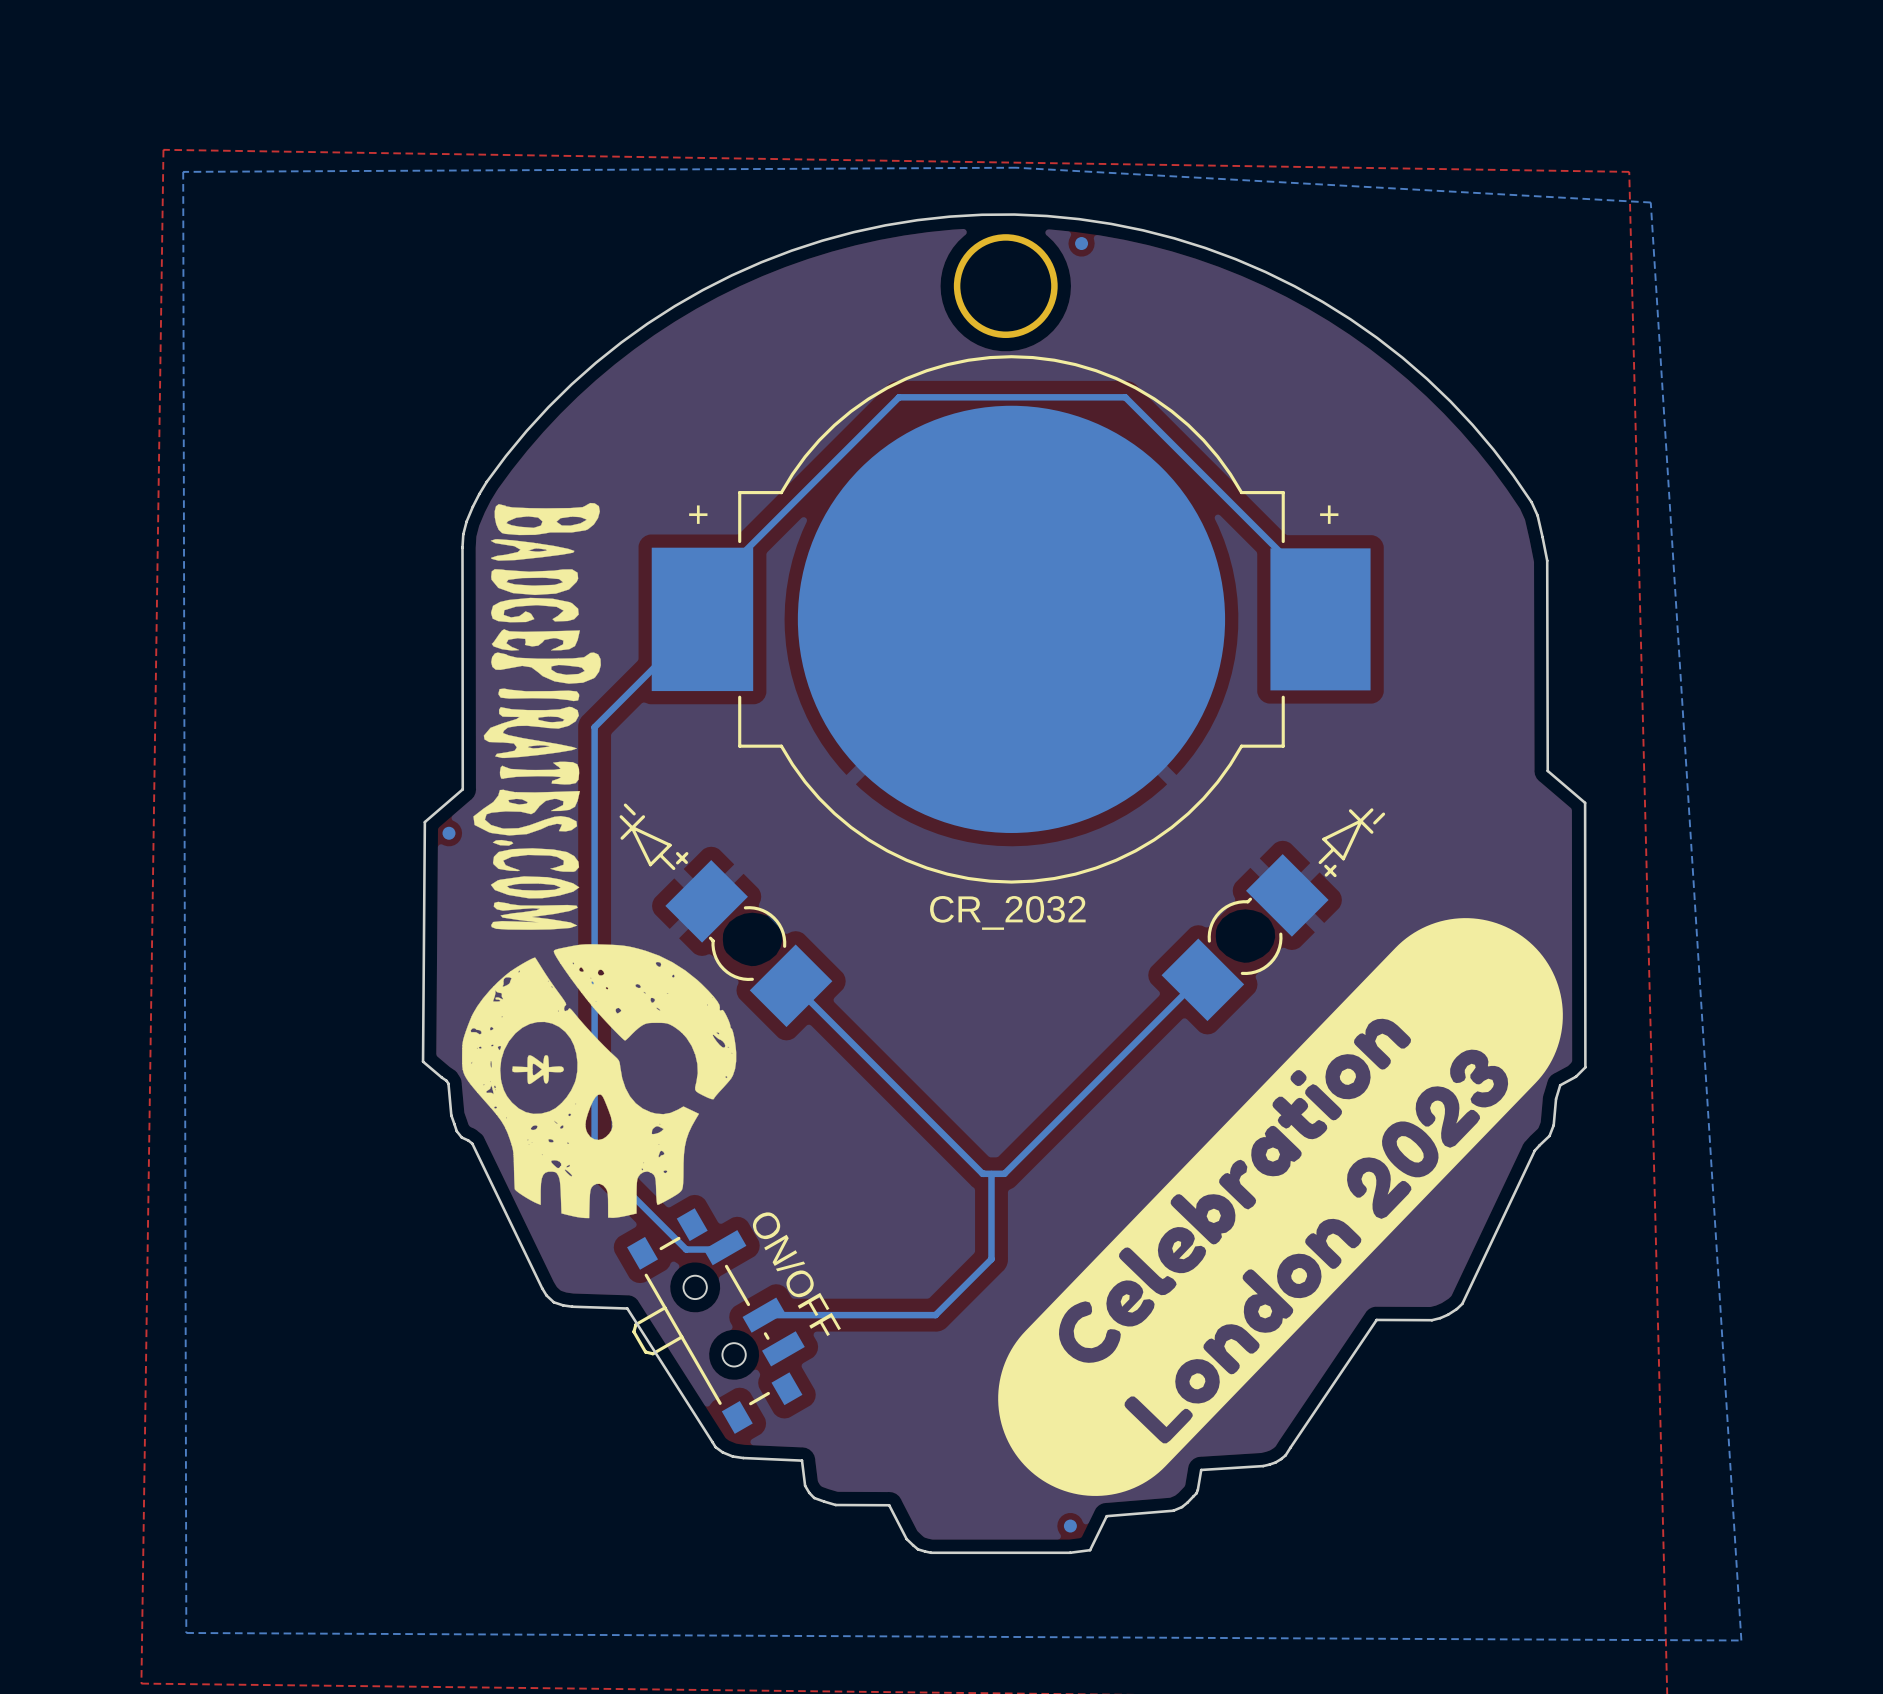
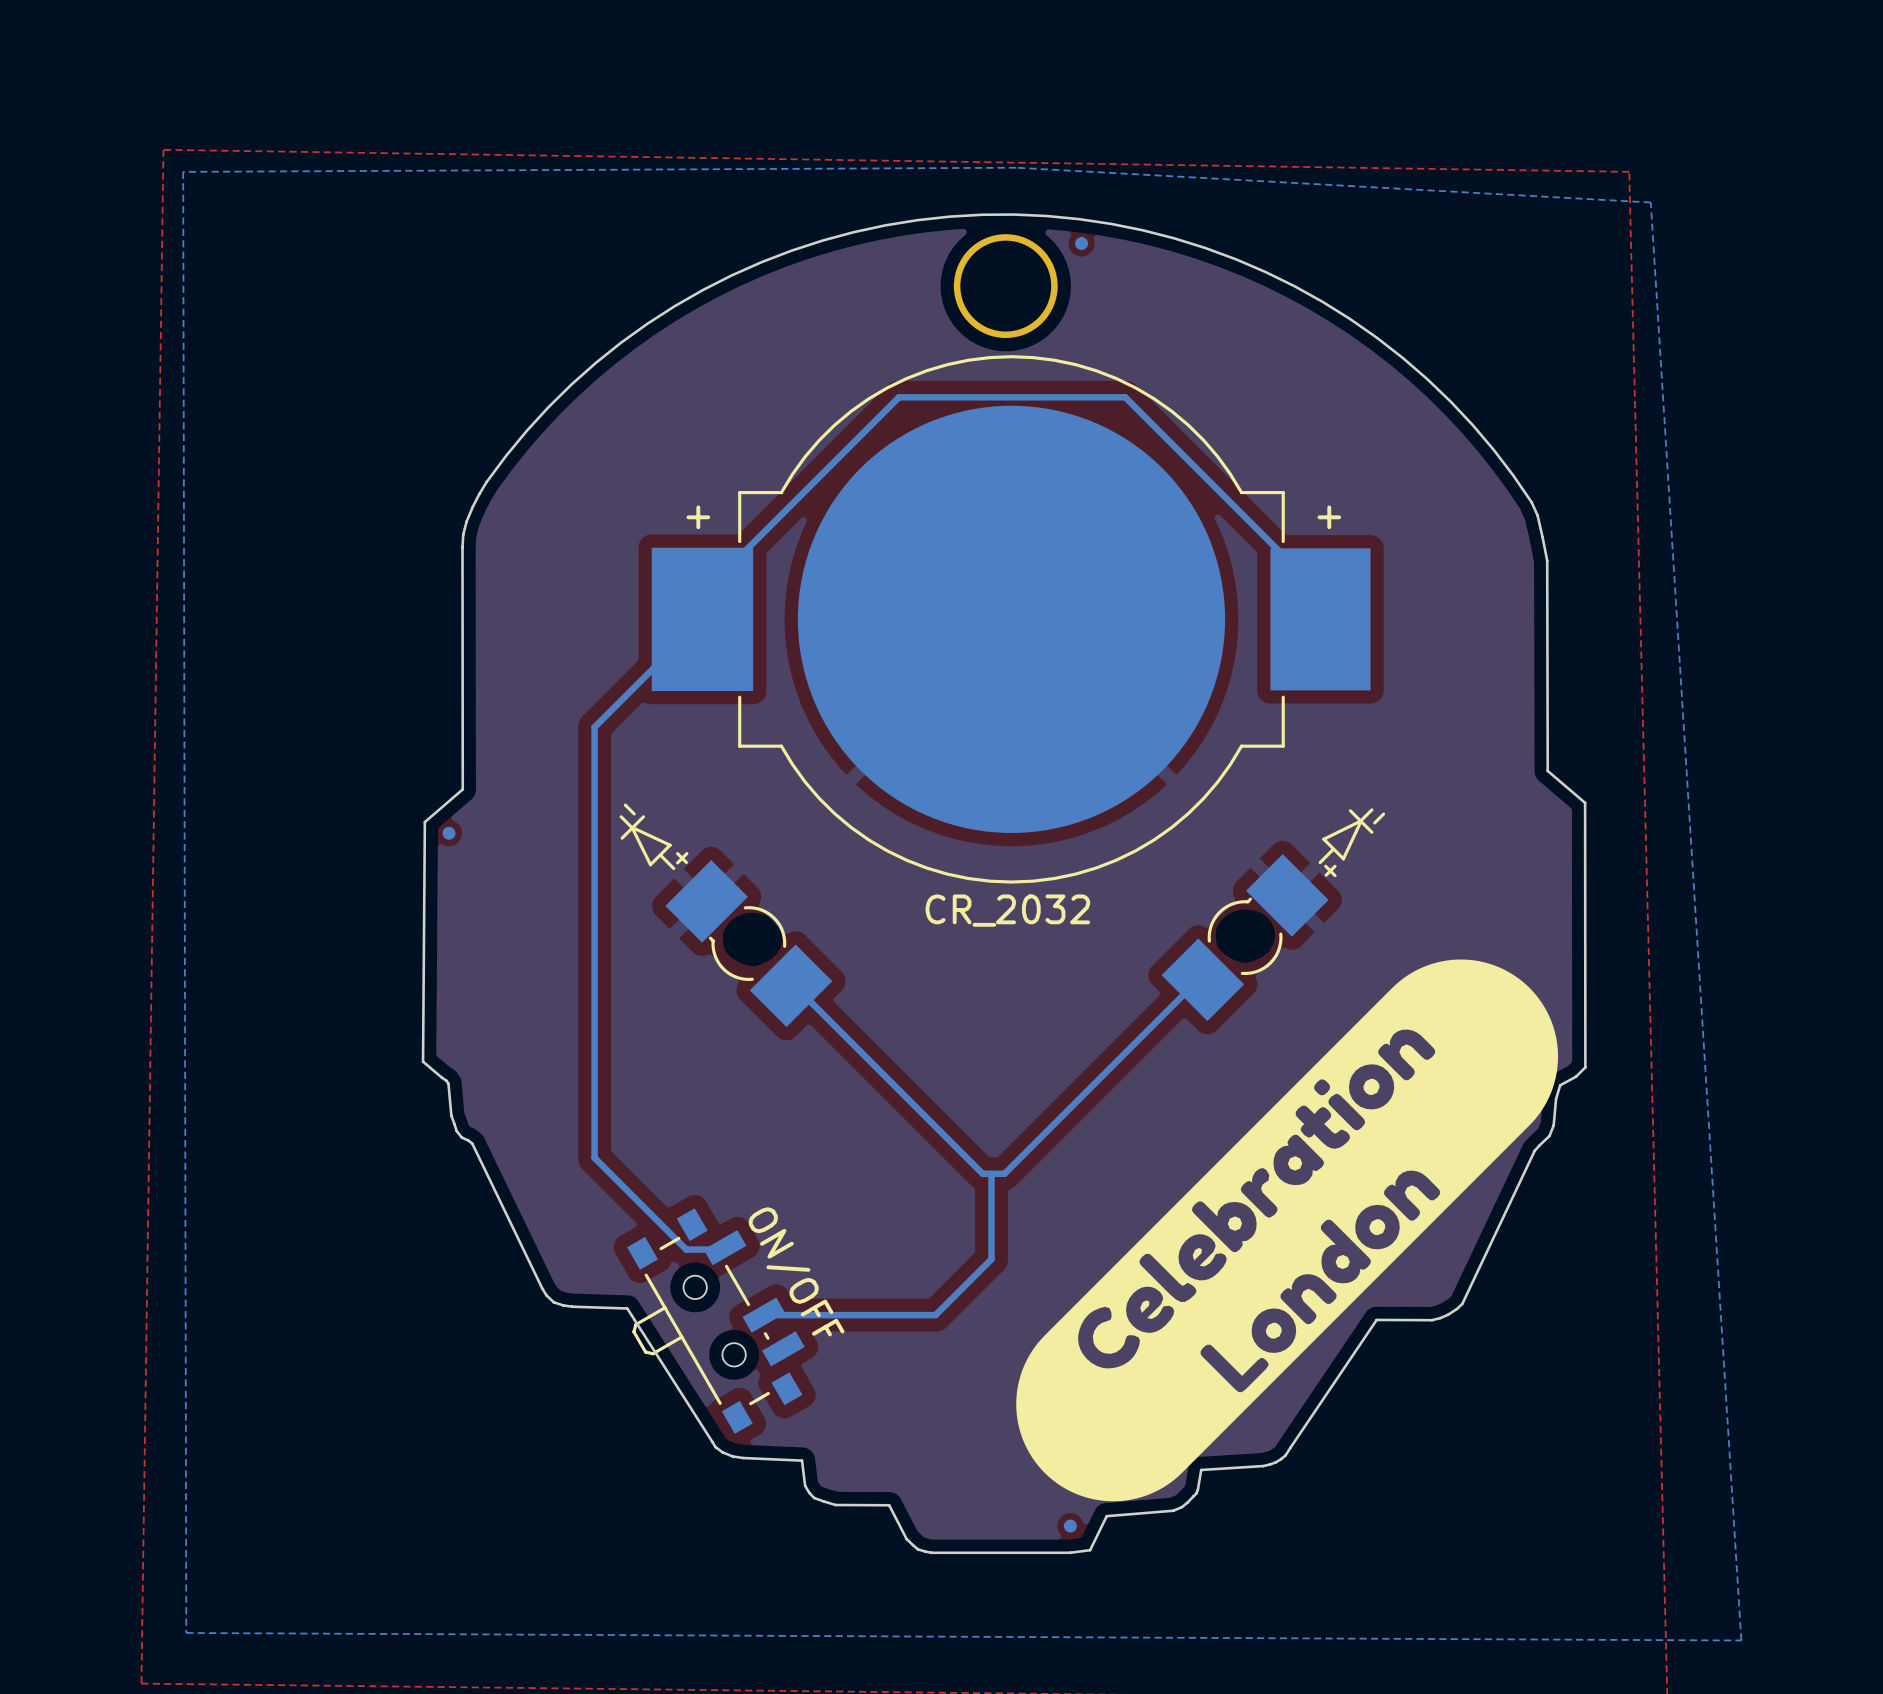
drawing: [461, 502, 737, 1219] -> none
drawing shape: [998, 918, 1563, 1496] -> [1016, 959, 1559, 1502]

